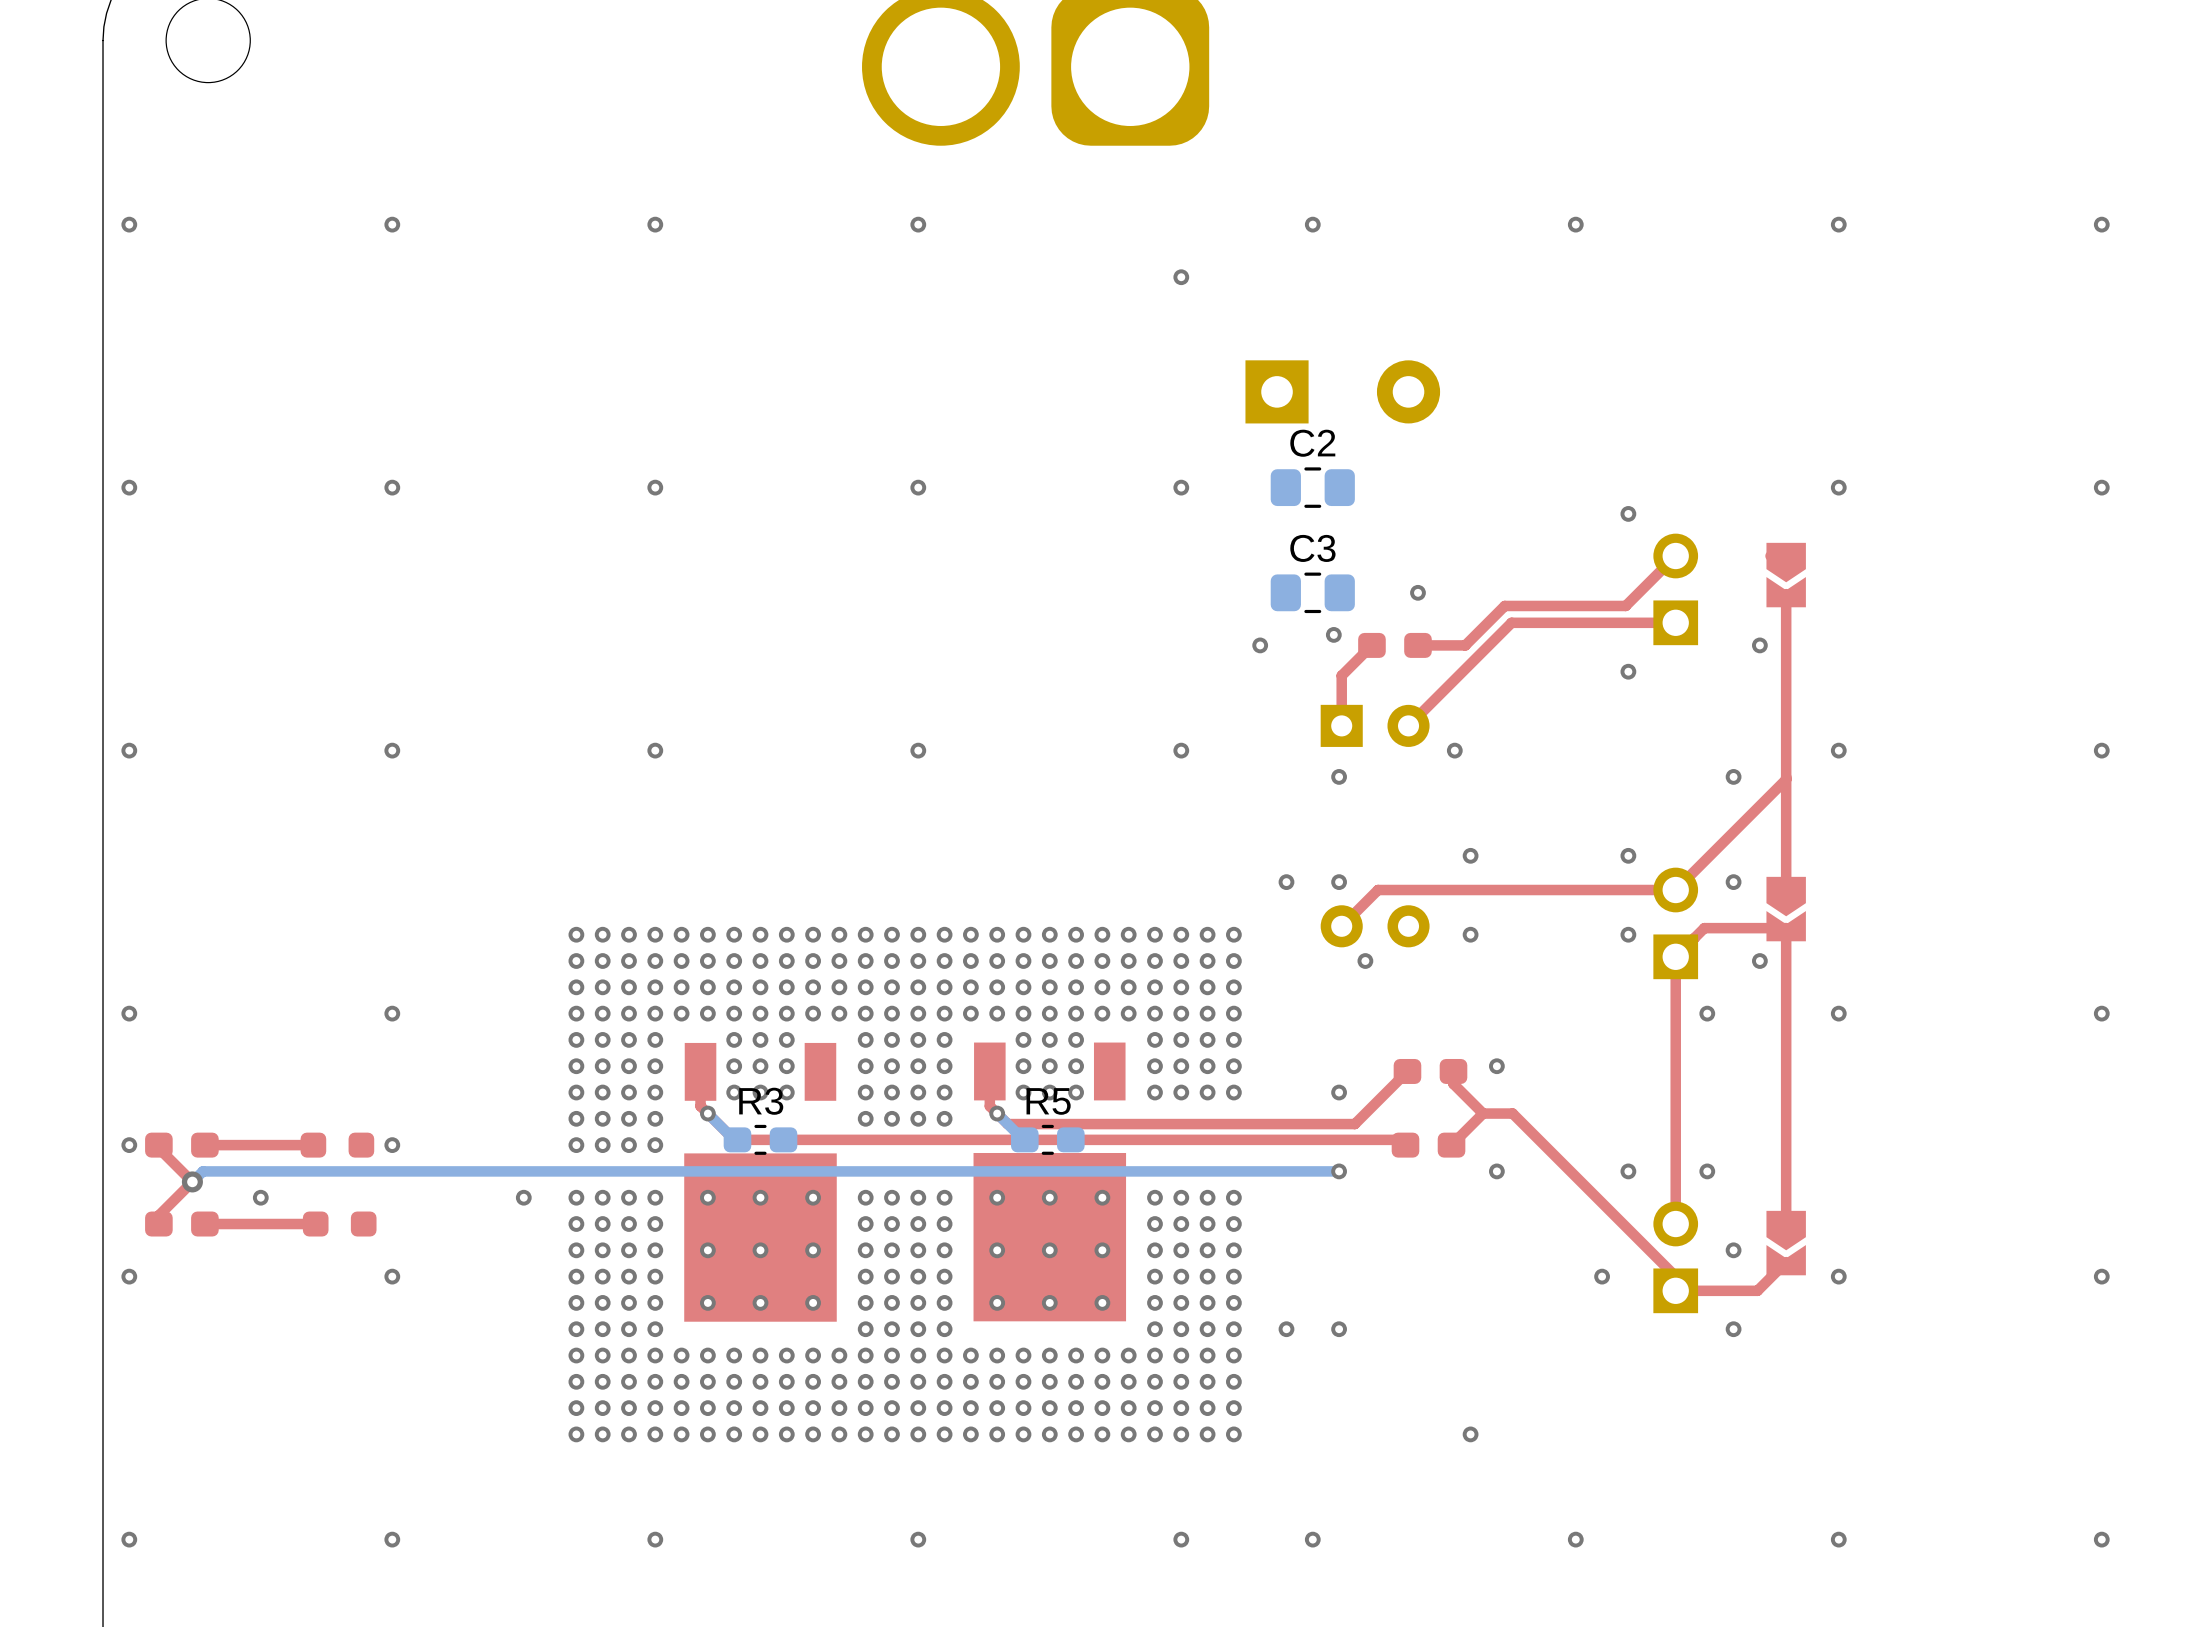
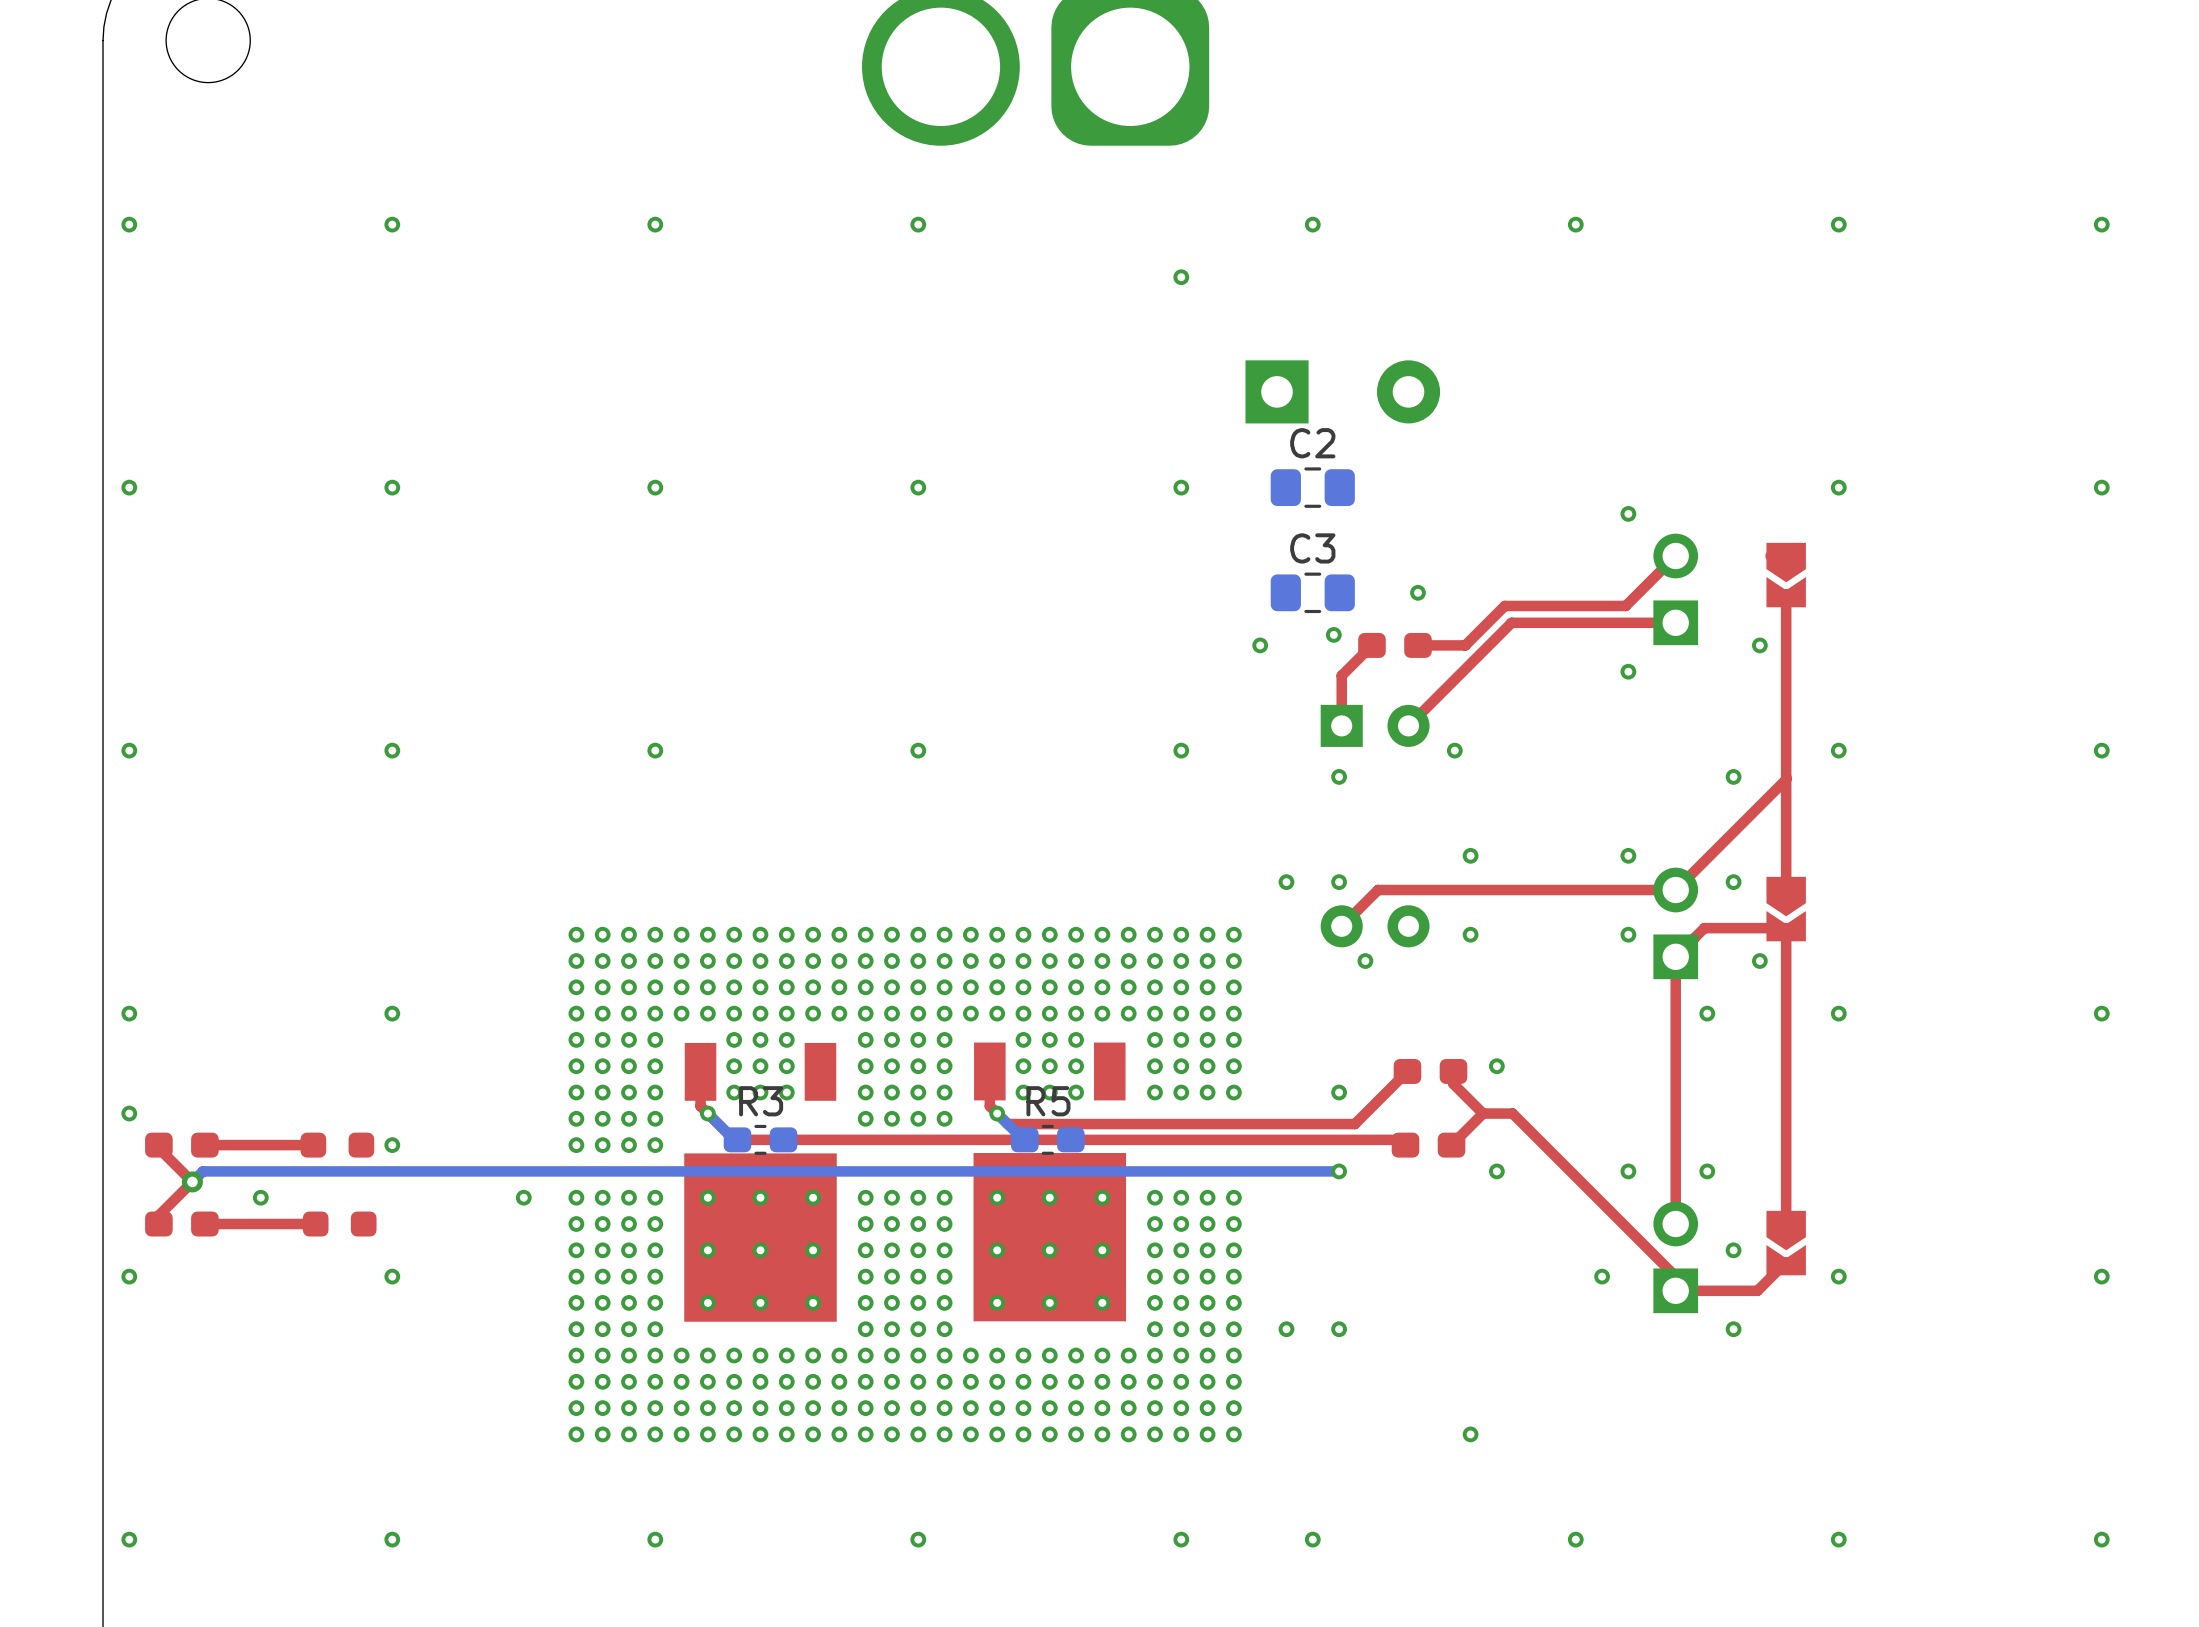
via position: (129, 1145) -> (129, 1113)

